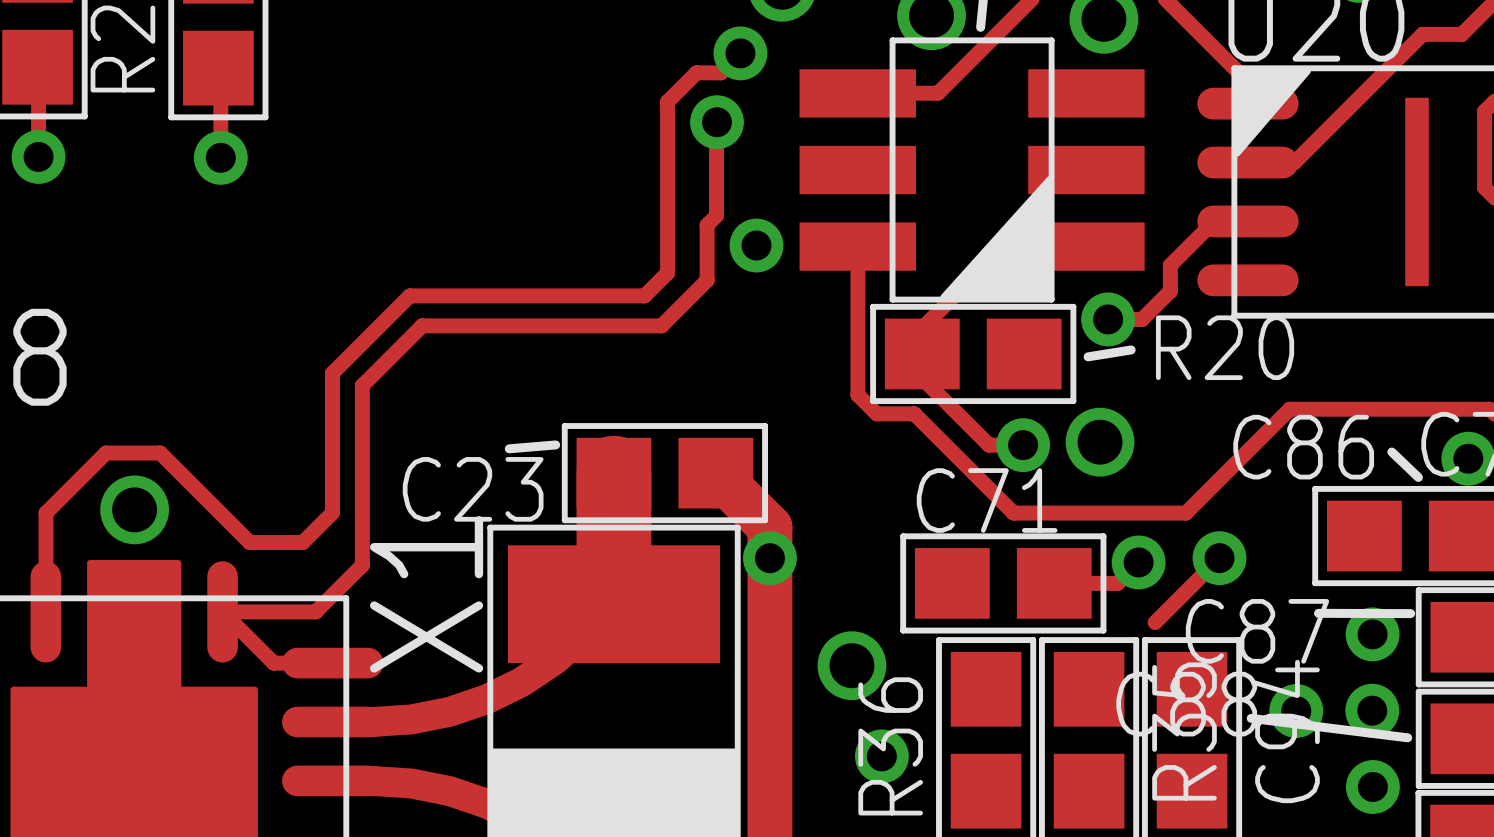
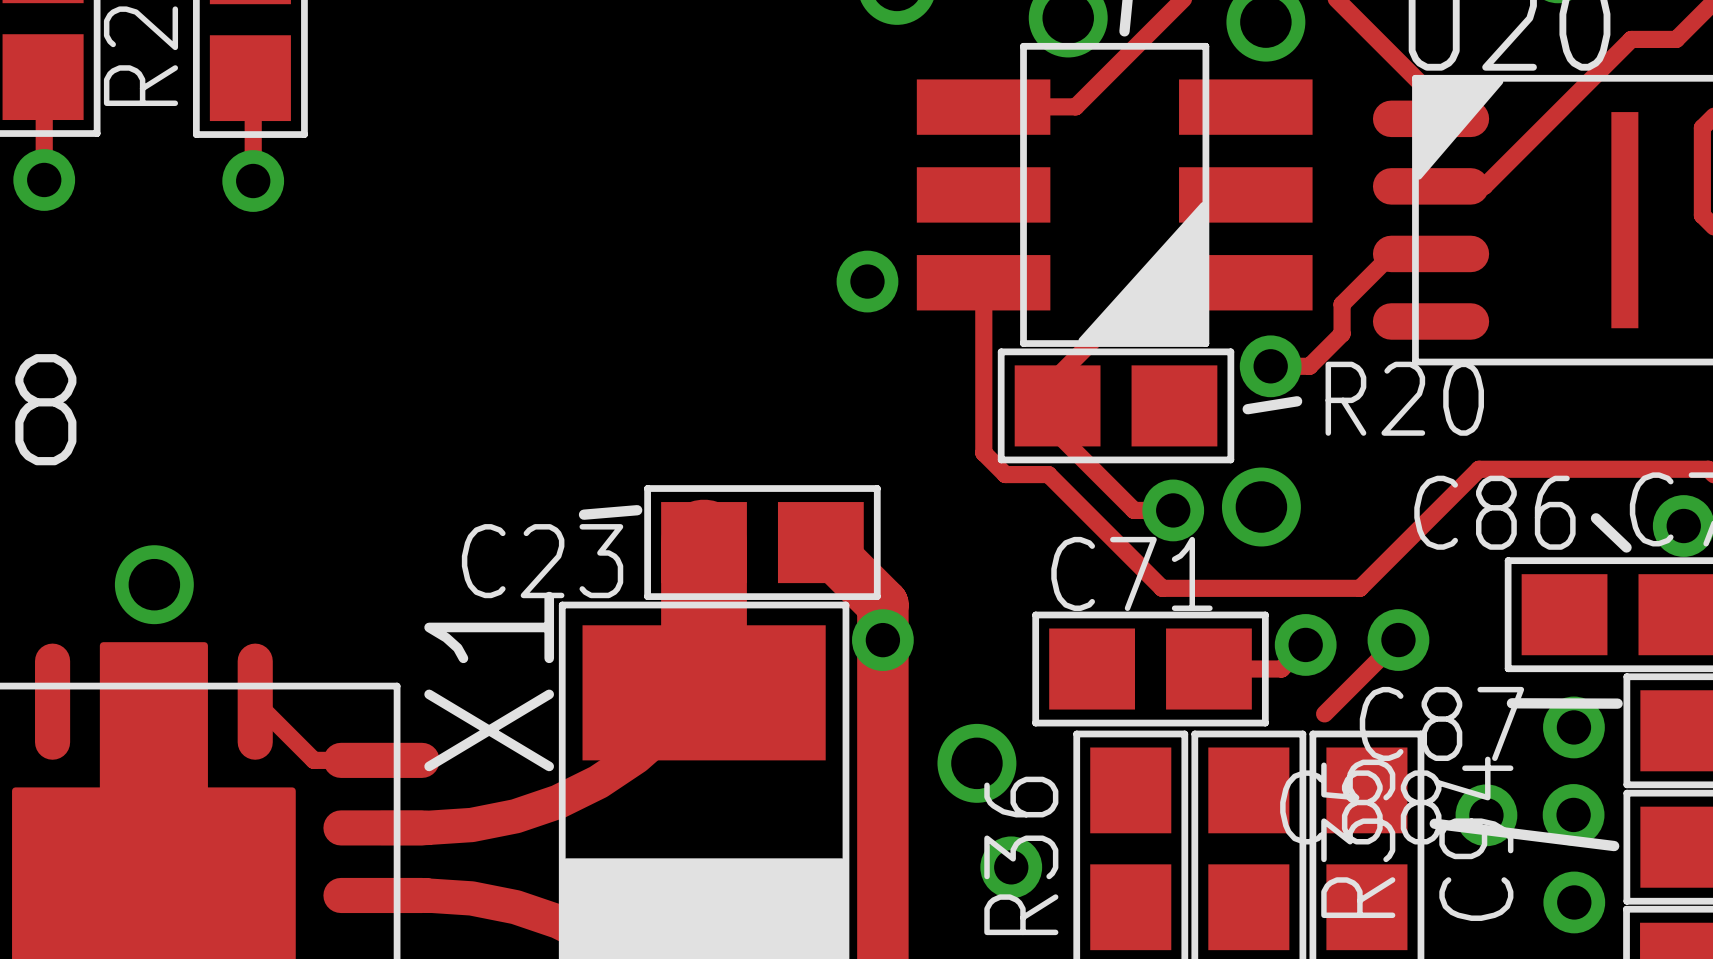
track: (740, 53) (720, 72) (696, 72) (667, 101) (667, 272) (644, 295) (409, 295) (332, 373) (332, 512) (302, 542) (249, 542) (160, 453) (105, 453) (46, 512) (46, 611) -> none
via: (740, 53) -> none
track: (716, 121) (716, 215) (707, 225) (707, 280) (661, 325) (422, 325) (362, 385) (362, 565) (315, 611) (222, 611) -> none
via: (716, 122) -> none

